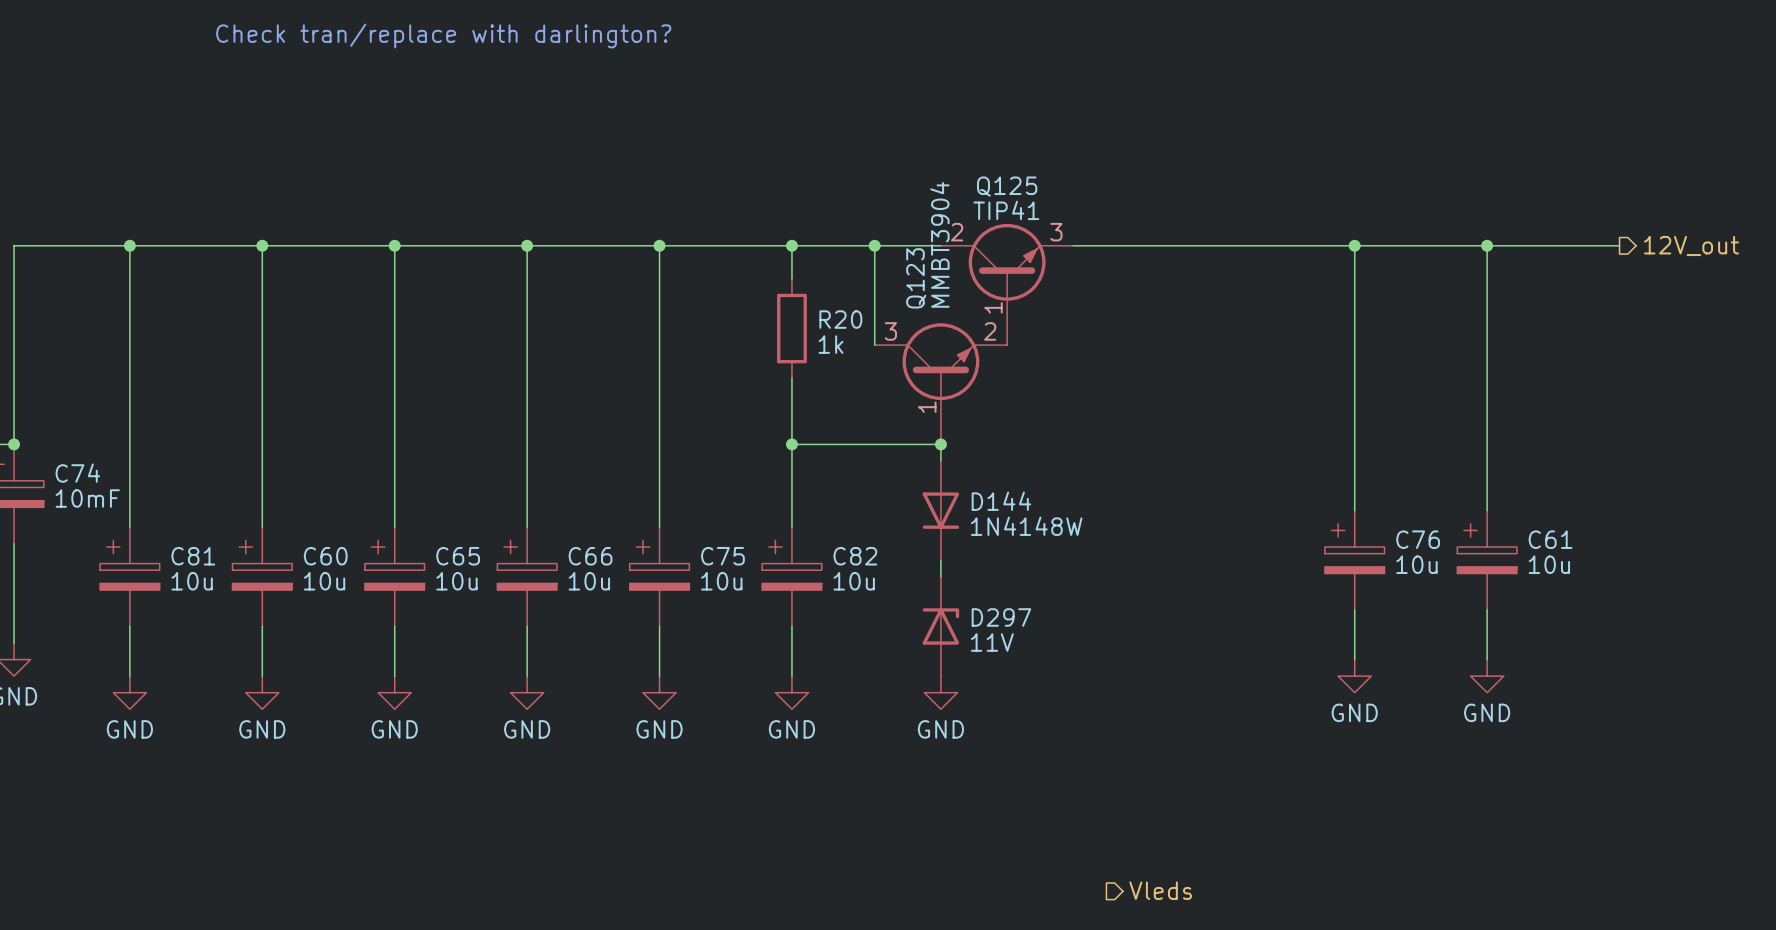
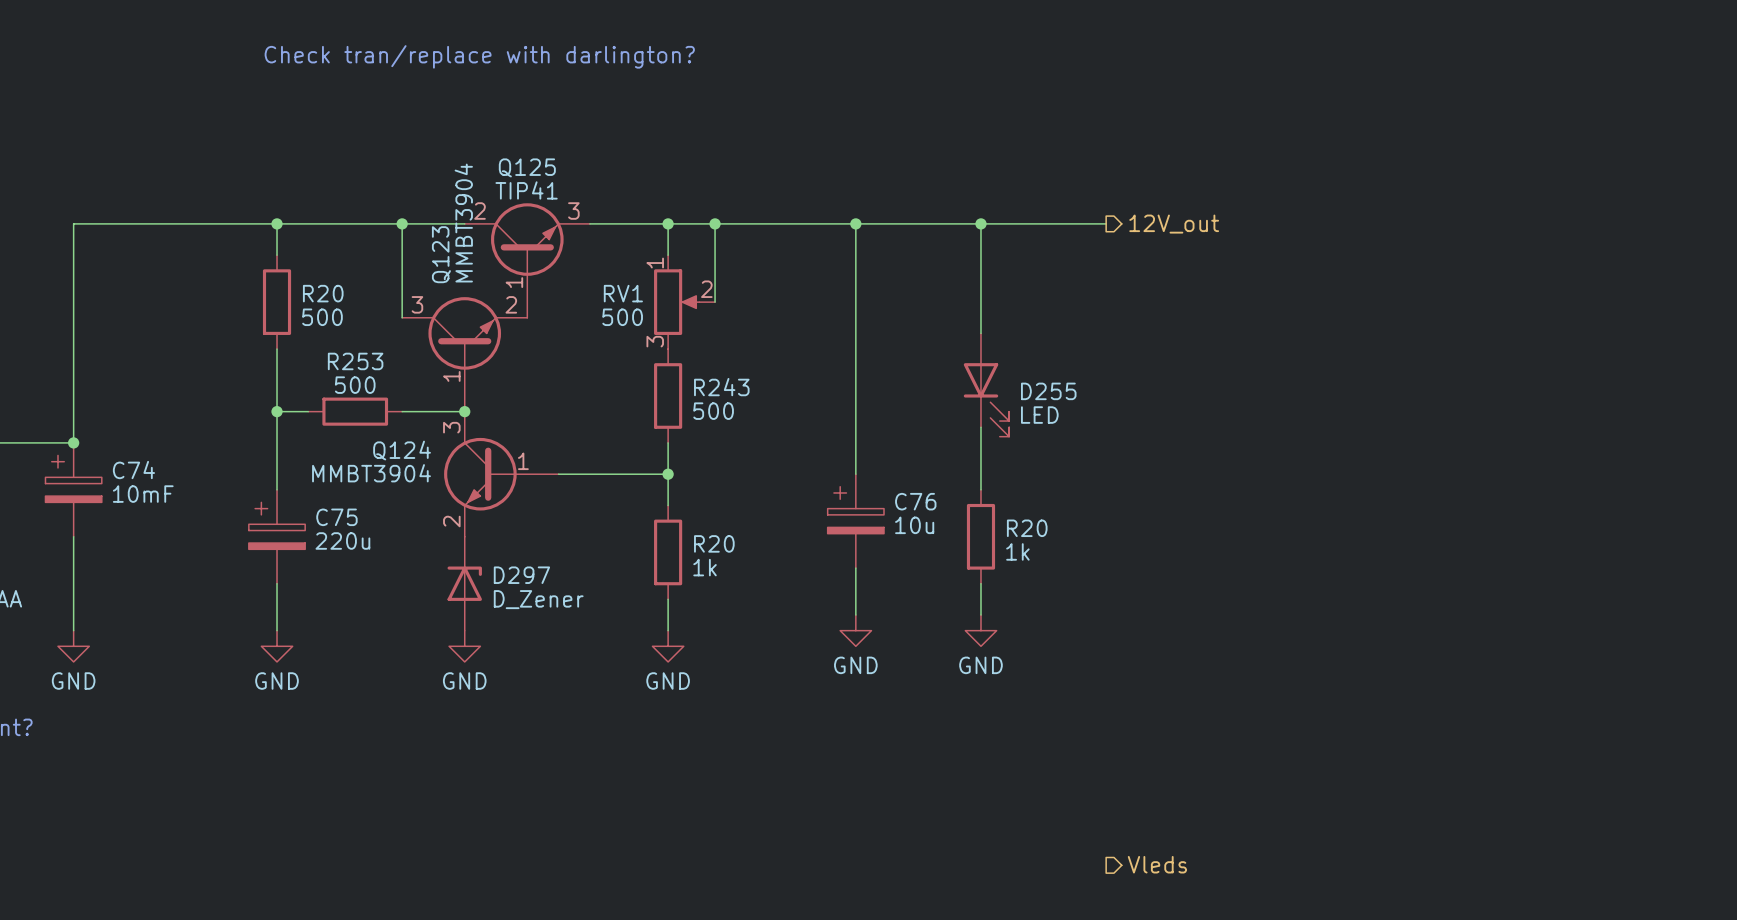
wire: none -> (277, 223) (277, 255)
wire: none -> (402, 223) (402, 317)
wire: none -> (589, 223) (1106, 223)
junction: none -> (668, 223)
wire: none -> (715, 223) (715, 302)
junction: none -> (715, 223)
wire: none -> (855, 223) (855, 474)
junction: none -> (855, 223)
wire: none -> (980, 223) (980, 333)
junction: none -> (980, 223)
hierarchical label: none -> 12V_out (1174, 224)
wire: (14, 245) (940, 245) -> (73, 255) (73, 223) (464, 223)
wire: (129, 245) (129, 527) -> none
junction: (129, 245) -> none
wire: (262, 245) (262, 527) -> none
junction position: (262, 245) -> (277, 223)
wire: (394, 245) (394, 527) -> none
junction position: (394, 245) -> (402, 223)
wire: (527, 245) (527, 527) -> none
junction: (527, 245) -> none
wire: (659, 245) (659, 527) -> none
junction: (659, 245) -> none
wire: (791, 245) (791, 278) -> (668, 223) (668, 255)
junction: (791, 245) -> none
wire: (874, 245) (874, 345) -> none
junction: (874, 245) -> none
wire: (1073, 245) (1619, 245) -> none
wire: (1354, 245) (1354, 510) -> none
junction: (1354, 245) -> none
wire: (1487, 245) (1487, 510) -> none
junction: (1487, 245) -> none
hierarchical label: 12V_out (1691, 245) -> none
Q125 position: (1007, 284) -> (527, 260)
R20: none -> 500 (277, 302)
RV1: none -> 500 (684, 302)
R20: 1k (791, 328) -> none
wire: none -> (277, 349) (277, 489)
wire: (791, 378) (791, 527) -> none
Q123 position: (940, 383) -> (464, 354)
D255: none -> LED (986, 385)
R243: none -> 500 (668, 395)
wire: none -> (277, 411) (308, 411)
junction: none -> (277, 411)
R253: none -> 500 (355, 411)
wire: none -> (402, 411) (464, 411)
junction: none -> (464, 411)
wire: none -> (980, 427) (980, 489)
wire: none -> (668, 442) (668, 505)
wire: (791, 444) (940, 444) (940, 460) -> none
junction: (791, 444) -> none
junction: (940, 444) -> none
Q124: none -> MMBT3904 (501, 474)
wire: none -> (558, 474) (668, 474)
junction: none -> (668, 474)
D144: 1N4148W (940, 510) -> none
R20: none -> 1k (980, 536)
R20: none -> 1k (668, 552)
wire: (940, 560) (940, 576) -> none
C76 position: (1354, 560) -> (855, 521)
C61: 10u (1487, 560) -> none
C81: 10u (129, 576) -> none
C60: 10u (262, 576) -> none
C65: 10u (394, 576) -> none
C66: 10u (527, 576) -> none
C75 position: (659, 576) -> (277, 536)
C82: 10u (791, 576) -> none
C75 value: 10u (721, 581) -> 220u (342, 540)
wire: none -> (980, 583) (980, 615)
wire: none -> (668, 599) (668, 630)
wire: (1354, 609) (1354, 659) -> none
wire: (1487, 609) (1487, 659) -> none
wire: (129, 626) (129, 676) -> none
wire: (262, 626) (262, 676) -> (277, 583) (277, 630)
wire: (394, 626) (394, 676) -> none
wire: (527, 626) (527, 676) -> none
wire: (659, 626) (659, 676) -> none
wire: (791, 626) (791, 676) -> (855, 568) (855, 615)
D297 position: (940, 626) -> (464, 583)
D297 value: 11V (992, 642) -> D_Zener (538, 599)
power symbol: none -> GND (855, 630)
power symbol: none -> GND (980, 630)
power symbol: GND (1354, 676) -> none
power symbol: GND (1487, 676) -> none
power symbol: GND (129, 692) -> none
power symbol position: GND (262, 692) -> GND (277, 646)
power symbol position: GND (394, 692) -> GND (464, 646)
power symbol: GND (527, 692) -> none
power symbol position: GND (659, 692) -> GND (668, 646)
power symbol: GND (791, 692) -> none
power symbol: GND (940, 692) -> none

